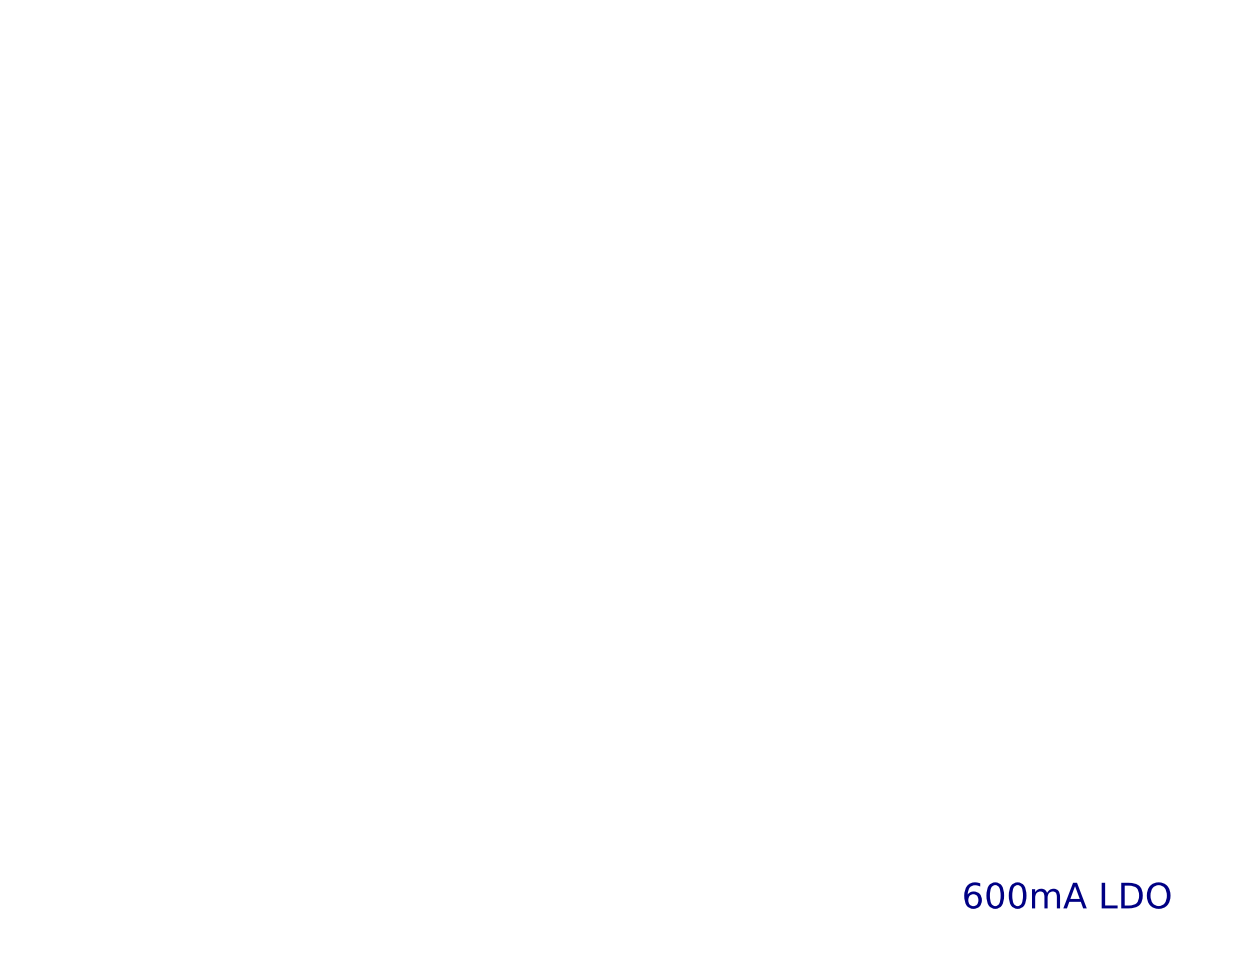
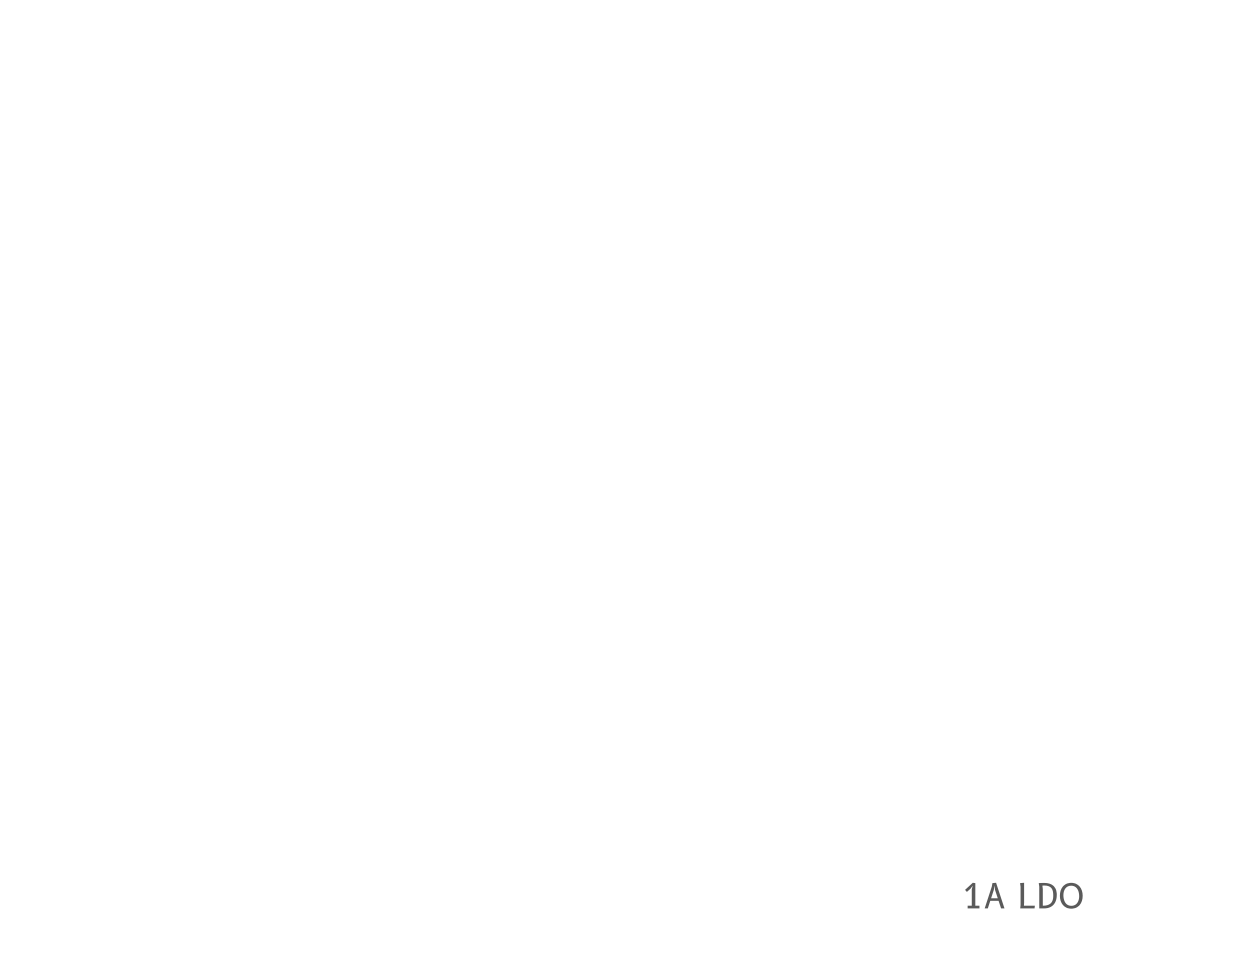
text: 600mA LDO (1067, 895) -> 1A LDO (1023, 895)

